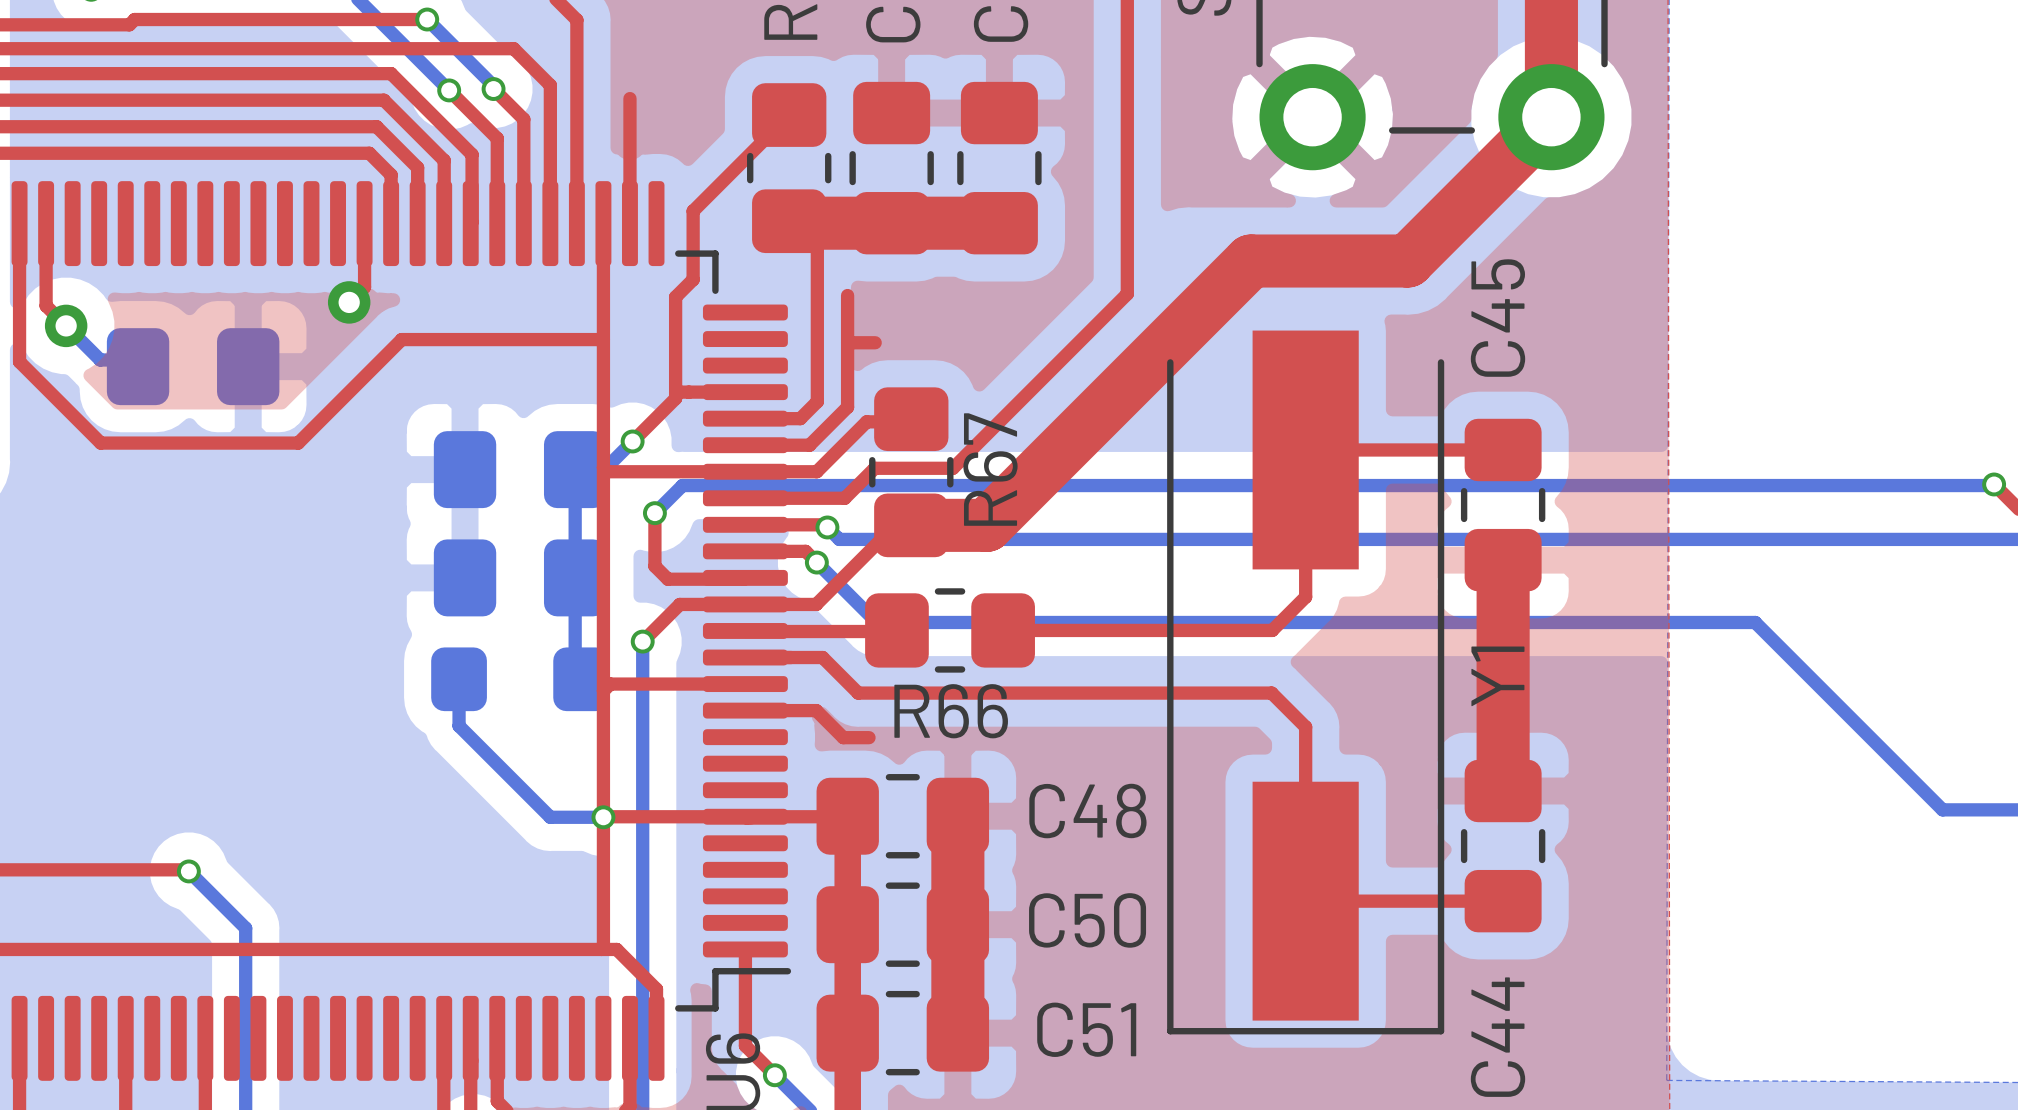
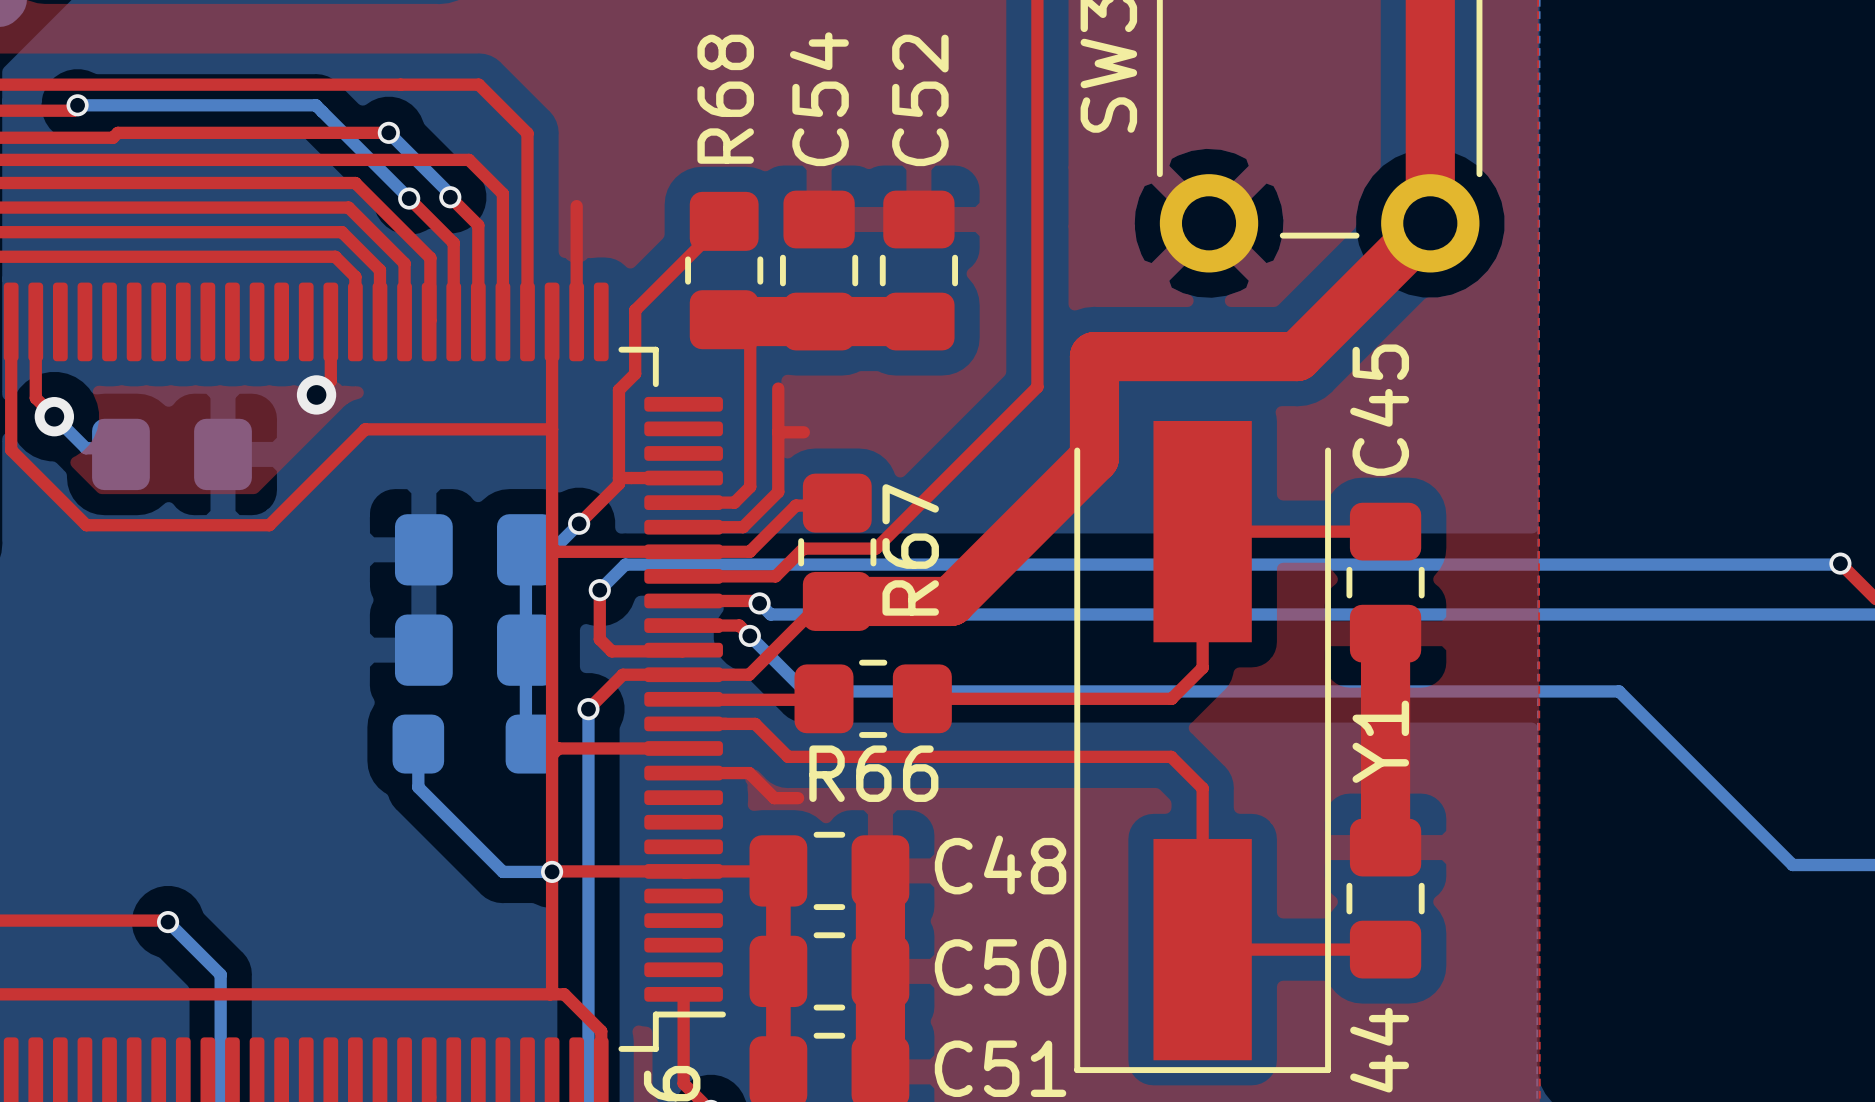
top track: (1250, 261) (986, 525) -> (1151, 356) (1094, 356) (1094, 457) (950, 601) (907, 601)

